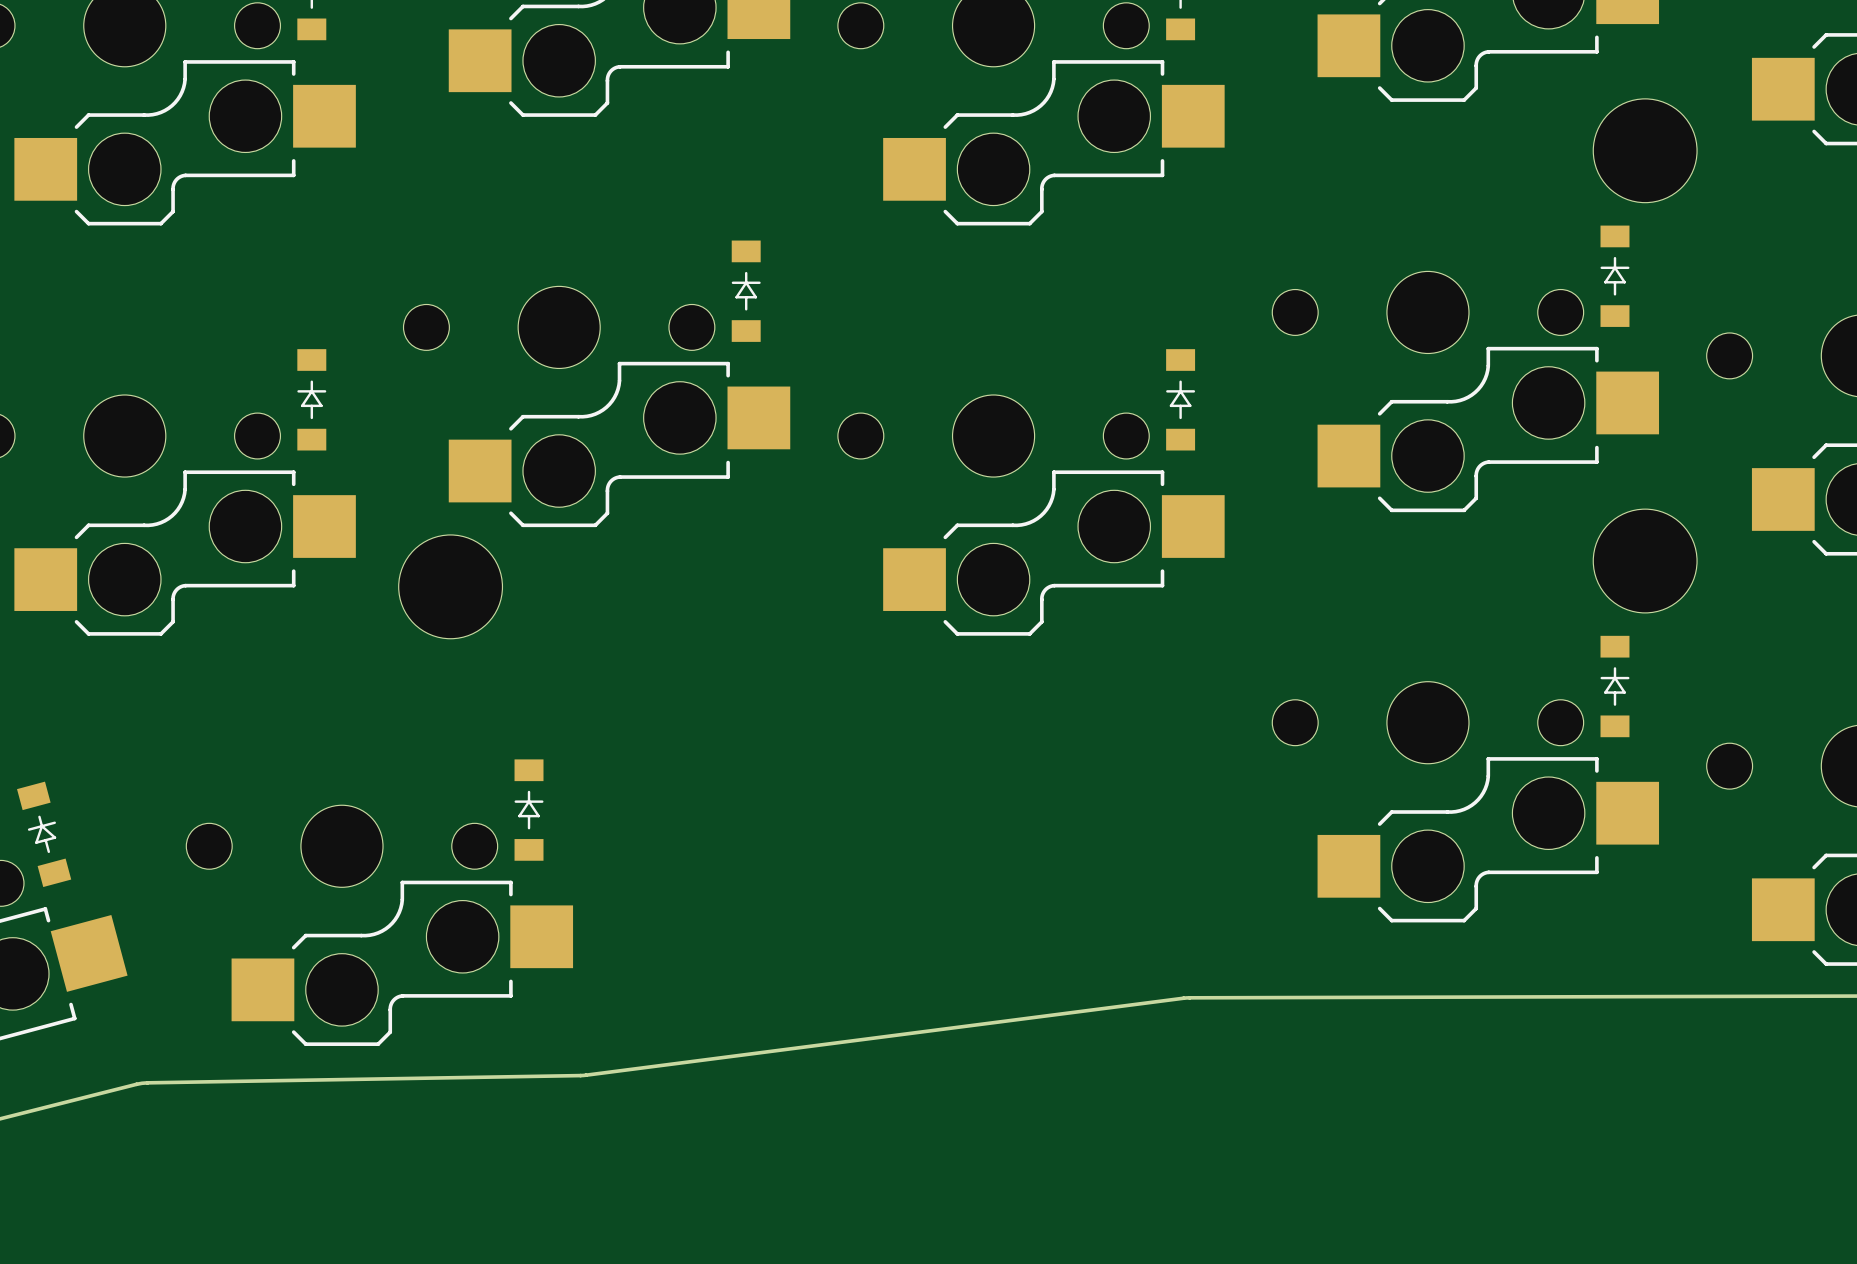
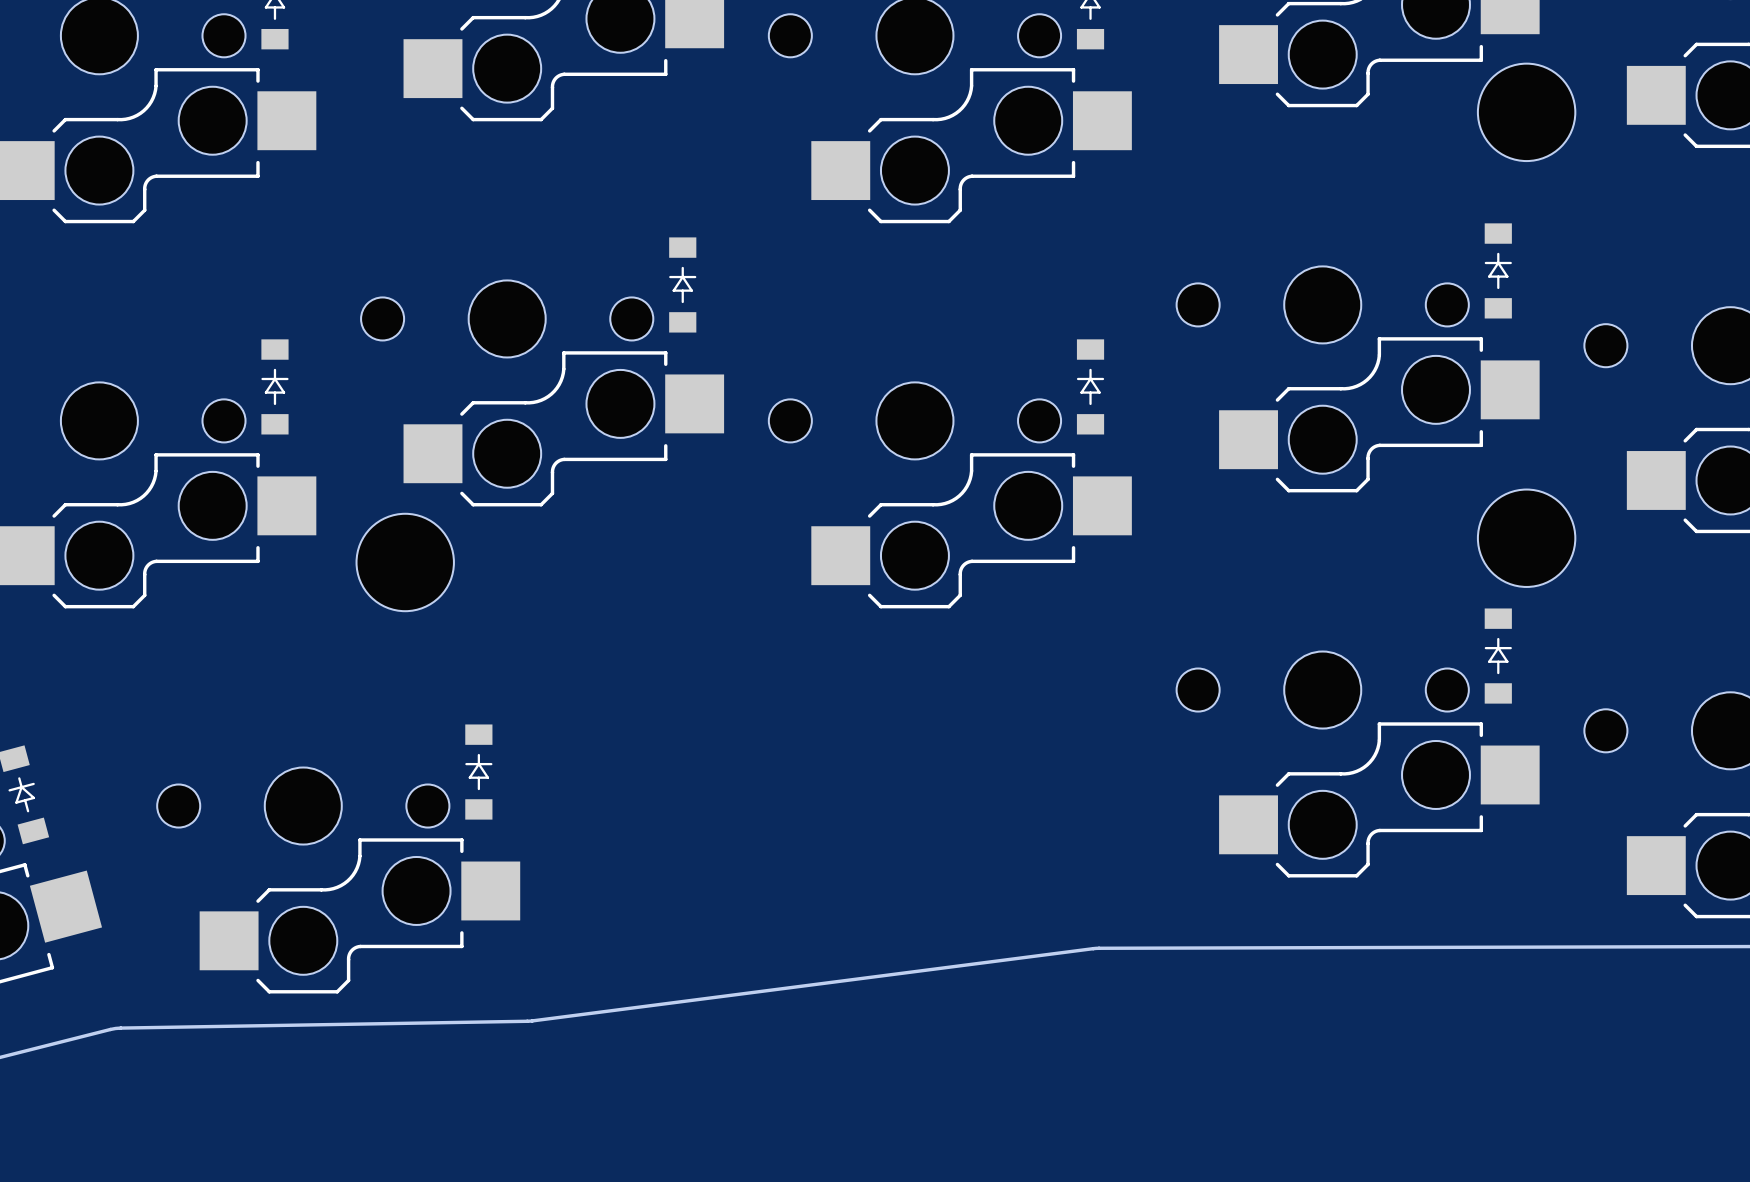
part position: (1645, 150) -> (1526, 112)

